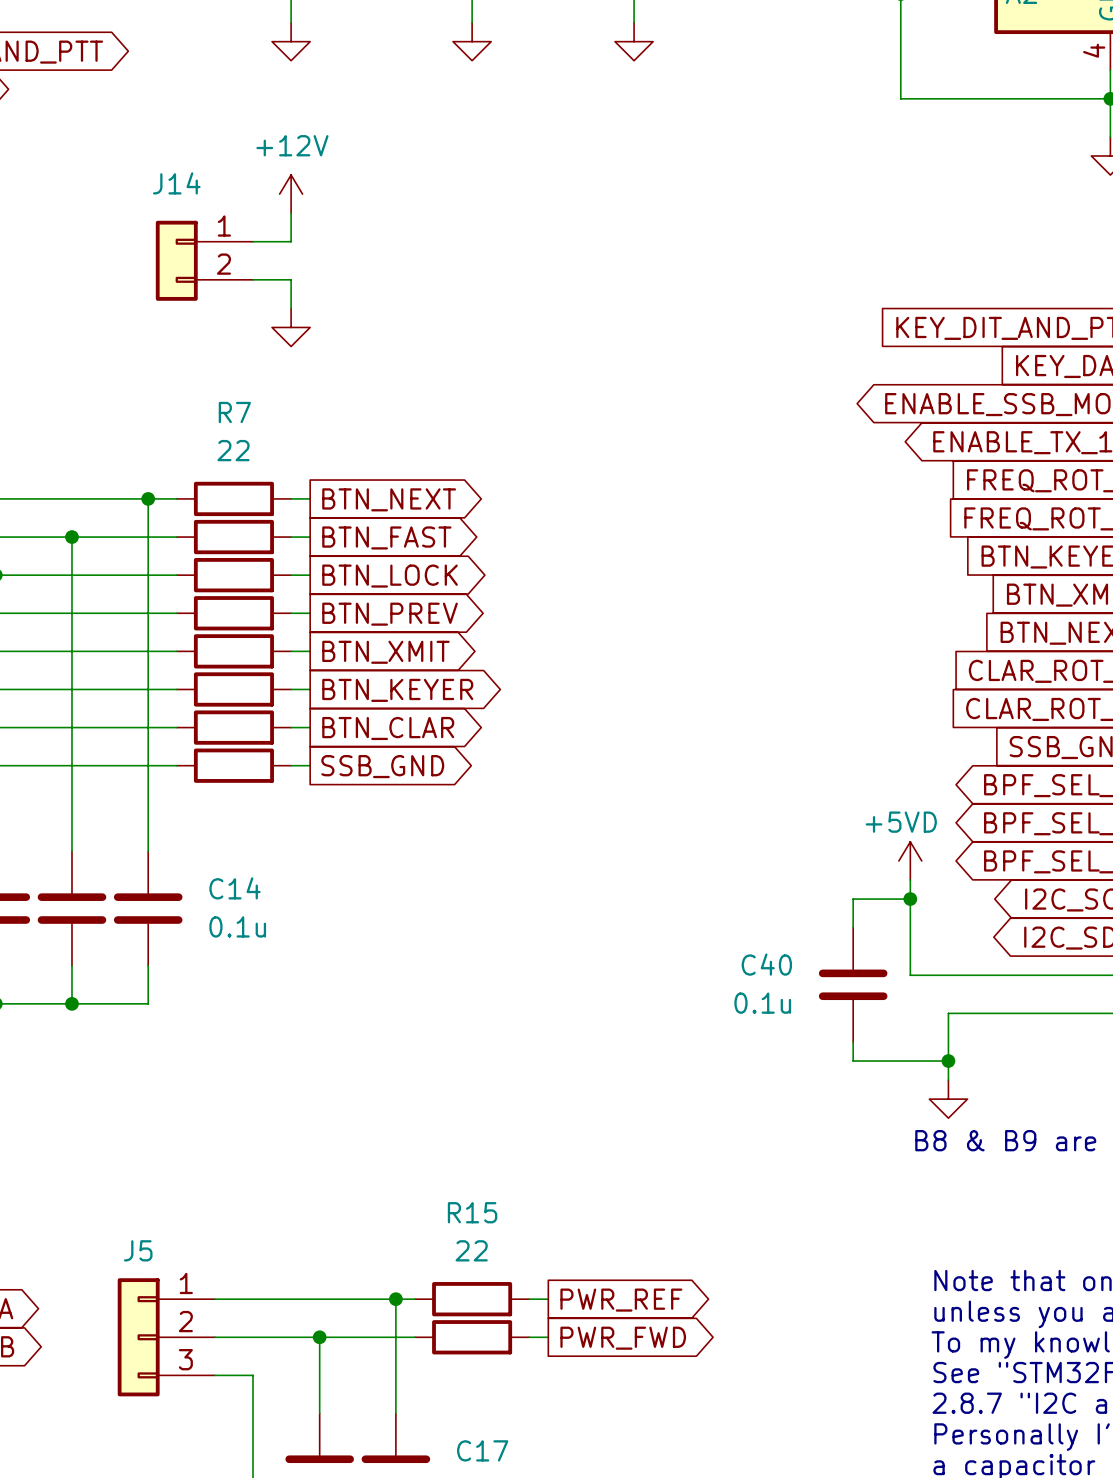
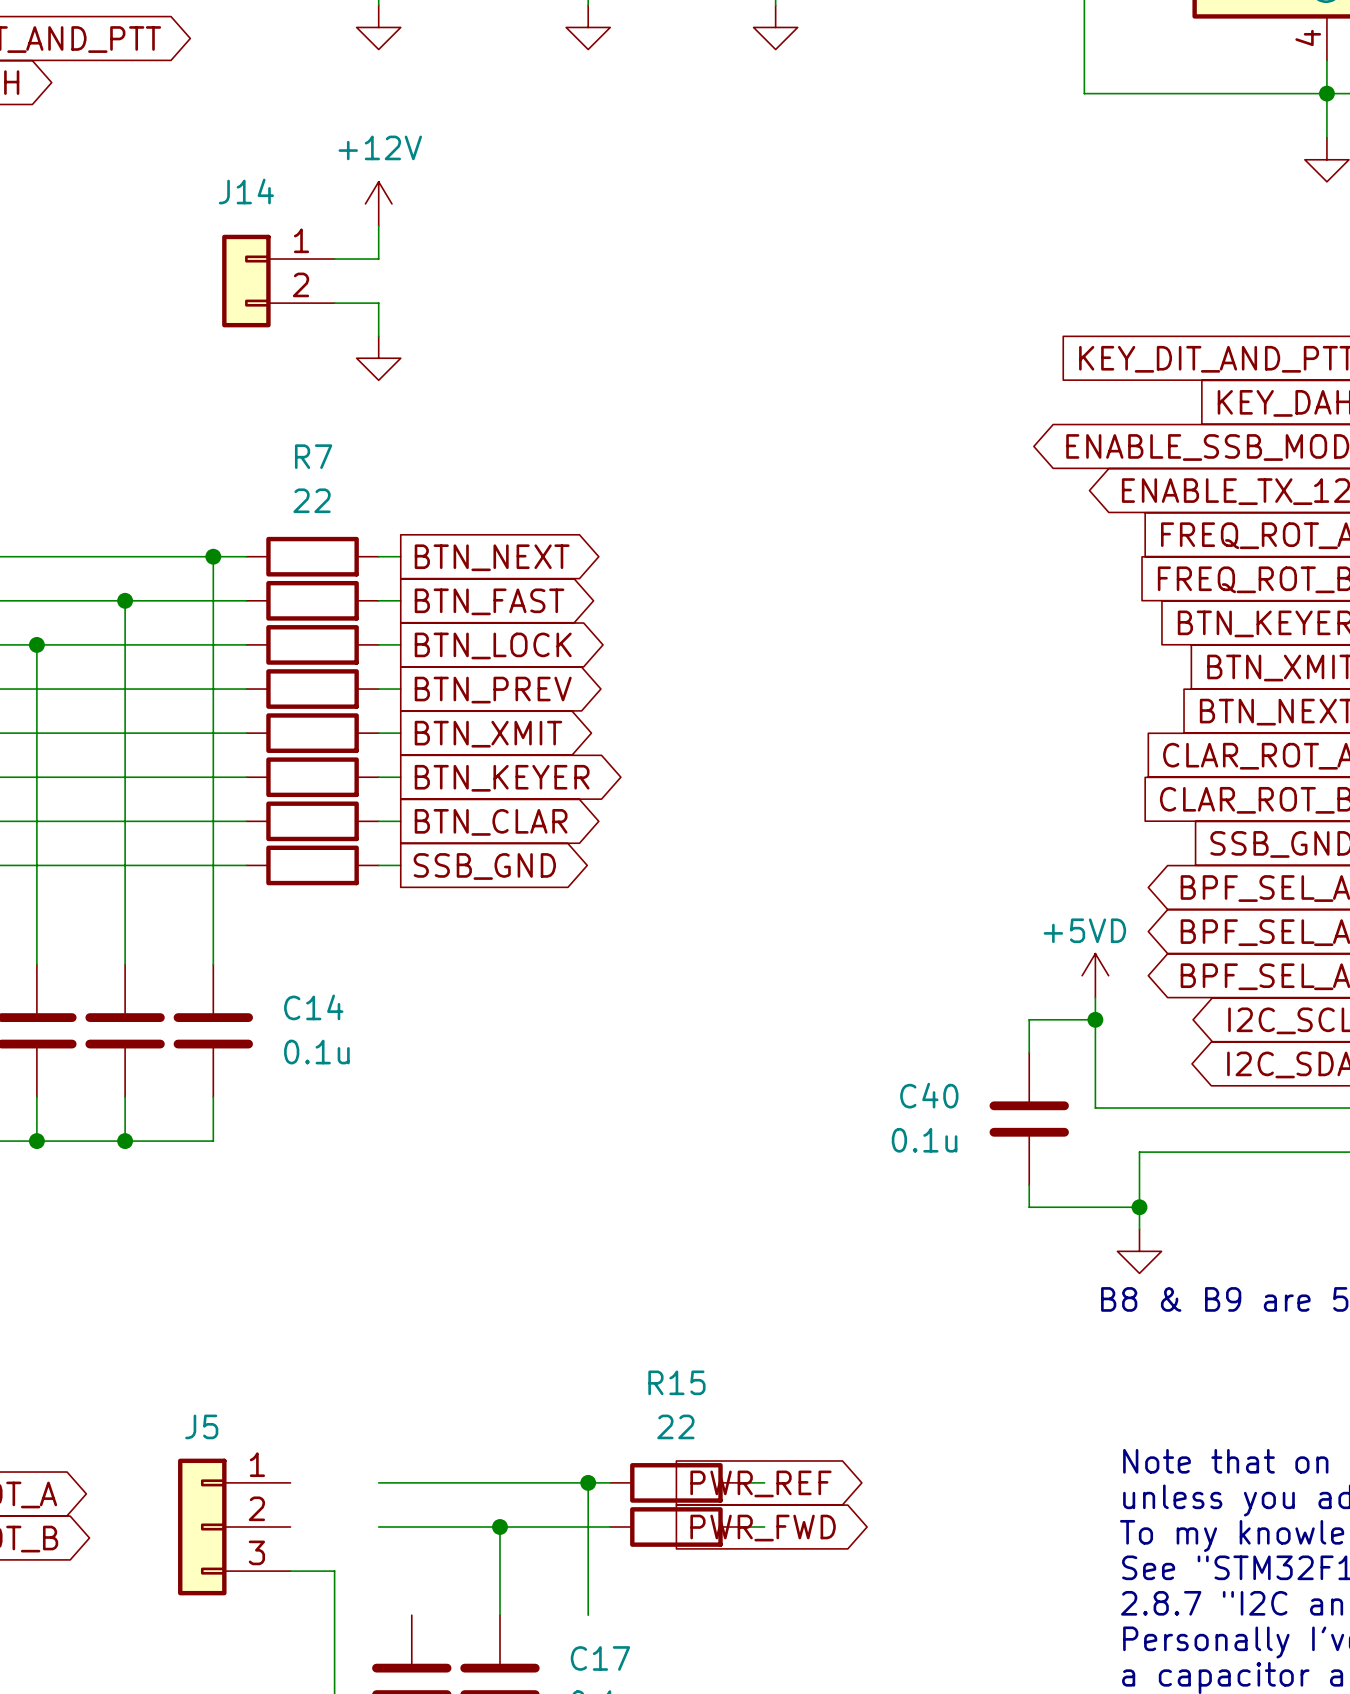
wire: (214, 1299) (291, 1299) -> (522, 1482) (610, 1482)
wire: (395, 1299) (395, 1337) -> none
junction: (395, 1299) -> none
wire: none -> (588, 1482) (588, 1615)
junction: none -> (588, 1482)
R15 position: (472, 1299) -> (676, 1482)
wire: (529, 1299) (548, 1299) -> (742, 1482) (764, 1482)
wire: (214, 1337) (291, 1337) -> (522, 1526) (610, 1526)
wire: (319, 1337) (319, 1413) -> none
junction: (319, 1337) -> none
junction: none -> (499, 1526)
part position: (472, 1337) -> (676, 1526)
wire: (529, 1337) (548, 1337) -> (742, 1526) (764, 1526)

